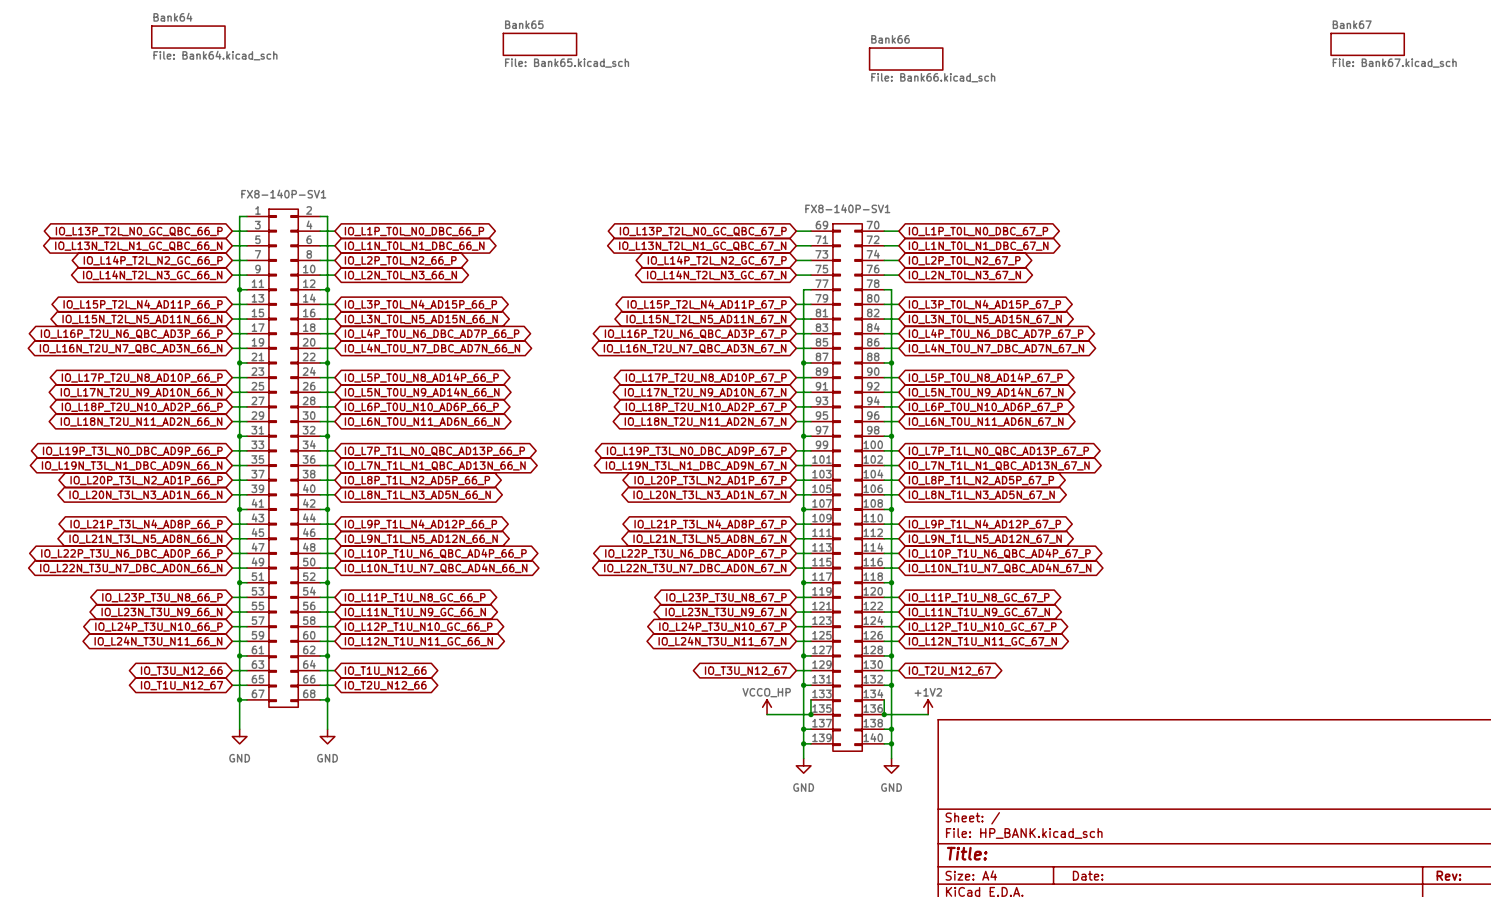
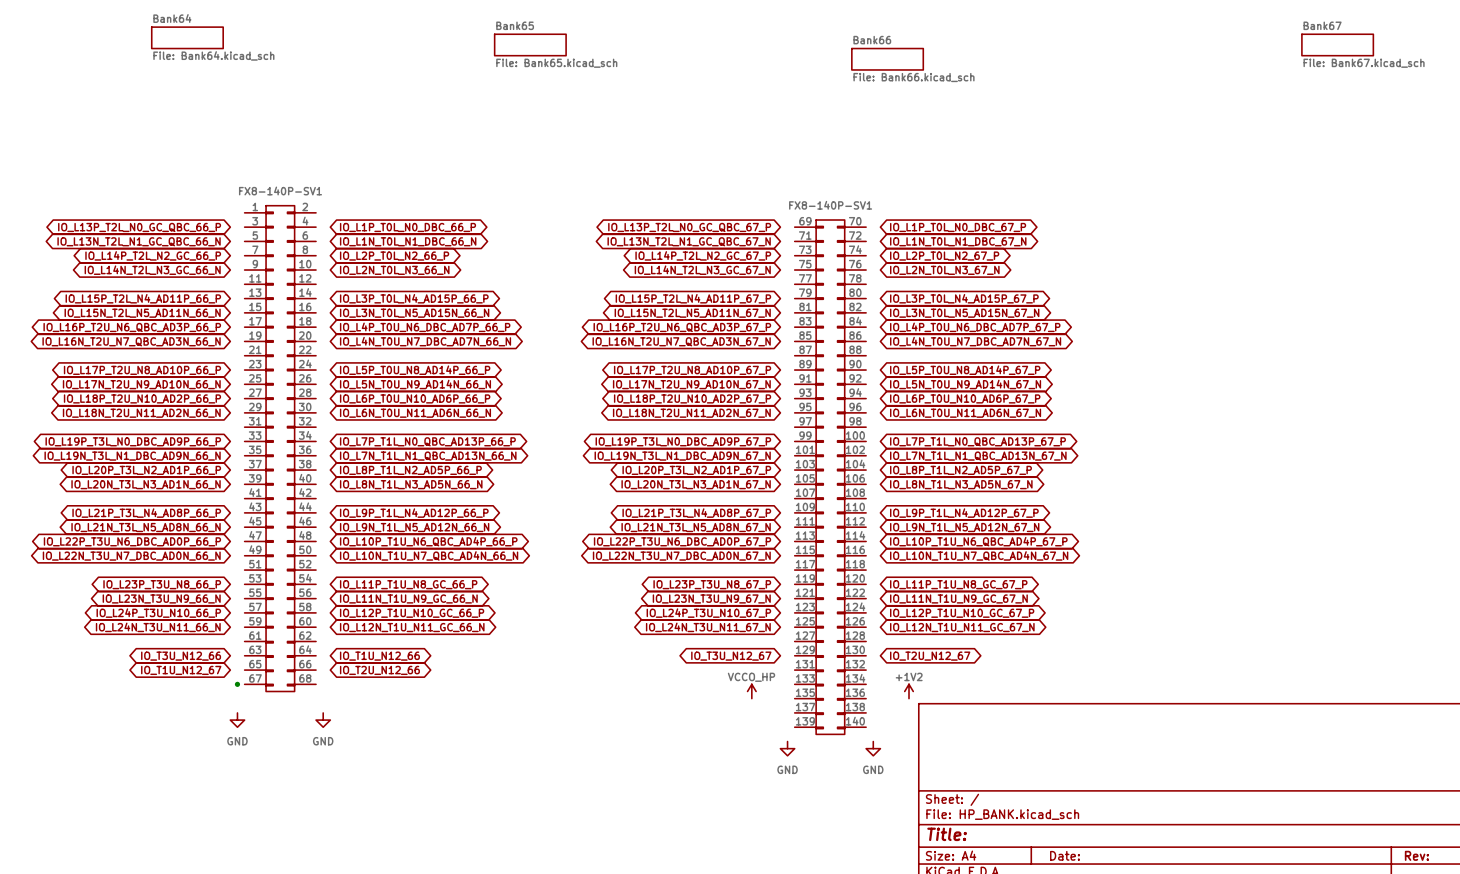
wire: (246, 216) (239, 216) (239, 729) -> none
wire: (320, 216) (327, 216) (327, 729) -> none
wire: (232, 231) (246, 231) -> none
wire: (320, 231) (334, 231) -> none
wire: (796, 231) (810, 231) -> none
wire: (884, 231) (898, 231) -> none
wire: (232, 245) (246, 245) -> none
wire: (320, 245) (334, 245) -> none
wire: (796, 245) (810, 245) -> none
wire: (884, 245) (898, 245) -> none
wire: (232, 260) (246, 260) -> none
wire: (320, 260) (334, 260) -> none
wire: (796, 260) (810, 260) -> none
wire: (884, 260) (898, 260) -> none
wire: (232, 275) (246, 275) -> none
wire: (320, 275) (334, 275) -> none
wire: (796, 275) (810, 275) -> none
wire: (884, 275) (898, 275) -> none
wire: (239, 289) (246, 289) -> none
junction: (239, 289) -> none
wire: (320, 289) (327, 289) -> none
junction: (327, 289) -> none
wire: (810, 289) (803, 289) (803, 758) -> none
wire: (884, 289) (891, 289) (891, 758) -> none
wire: (232, 304) (246, 304) -> none
wire: (320, 304) (334, 304) -> none
wire: (796, 304) (810, 304) -> none
wire: (884, 304) (898, 304) -> none
wire: (232, 319) (246, 319) -> none
wire: (320, 319) (334, 319) -> none
wire: (796, 319) (810, 319) -> none
wire: (884, 319) (898, 319) -> none
wire: (232, 333) (246, 333) -> none
wire: (320, 333) (334, 333) -> none
wire: (796, 333) (810, 333) -> none
wire: (884, 333) (898, 333) -> none
wire: (232, 348) (246, 348) -> none
wire: (320, 348) (334, 348) -> none
wire: (796, 348) (810, 348) -> none
wire: (884, 348) (898, 348) -> none
wire: (239, 362) (246, 362) -> none
junction: (239, 362) -> none
wire: (320, 362) (327, 362) -> none
junction: (327, 362) -> none
wire: (803, 362) (810, 362) -> none
junction: (803, 362) -> none
wire: (884, 362) (891, 362) -> none
junction: (891, 362) -> none
wire: (232, 377) (246, 377) -> none
wire: (320, 377) (334, 377) -> none
wire: (796, 377) (810, 377) -> none
wire: (884, 377) (898, 377) -> none
wire: (232, 392) (246, 392) -> none
wire: (320, 392) (334, 392) -> none
wire: (796, 392) (810, 392) -> none
wire: (884, 392) (898, 392) -> none
wire: (232, 406) (246, 406) -> none
wire: (320, 406) (334, 406) -> none
wire: (796, 406) (810, 406) -> none
wire: (884, 406) (898, 406) -> none
wire: (232, 421) (246, 421) -> none
wire: (320, 421) (334, 421) -> none
wire: (796, 421) (810, 421) -> none
wire: (884, 421) (898, 421) -> none
wire: (239, 436) (246, 436) -> none
junction: (239, 436) -> none
wire: (320, 436) (327, 436) -> none
junction: (327, 436) -> none
wire: (803, 436) (810, 436) -> none
junction: (803, 436) -> none
wire: (884, 436) (891, 436) -> none
junction: (891, 436) -> none
wire: (232, 450) (246, 450) -> none
wire: (320, 450) (334, 450) -> none
wire: (796, 450) (810, 450) -> none
wire: (884, 450) (898, 450) -> none
wire: (232, 465) (246, 465) -> none
wire: (320, 465) (334, 465) -> none
wire: (796, 465) (810, 465) -> none
wire: (884, 465) (898, 465) -> none
wire: (232, 480) (246, 480) -> none
wire: (320, 480) (334, 480) -> none
wire: (796, 480) (810, 480) -> none
wire: (884, 480) (898, 480) -> none
wire: (232, 494) (246, 494) -> none
wire: (320, 494) (334, 494) -> none
wire: (796, 494) (810, 494) -> none
wire: (884, 494) (898, 494) -> none
wire: (239, 509) (246, 509) -> none
junction: (239, 509) -> none
wire: (320, 509) (327, 509) -> none
junction: (327, 509) -> none
wire: (803, 509) (810, 509) -> none
junction: (803, 509) -> none
wire: (884, 509) (891, 509) -> none
junction: (891, 509) -> none
wire: (232, 524) (246, 524) -> none
wire: (320, 524) (334, 524) -> none
wire: (796, 524) (810, 524) -> none
wire: (884, 524) (898, 524) -> none
wire: (232, 538) (246, 538) -> none
wire: (320, 538) (334, 538) -> none
wire: (796, 538) (810, 538) -> none
wire: (884, 538) (898, 538) -> none
wire: (232, 553) (246, 553) -> none
wire: (320, 553) (334, 553) -> none
wire: (796, 553) (810, 553) -> none
wire: (884, 553) (898, 553) -> none
wire: (232, 568) (246, 568) -> none
wire: (320, 568) (334, 568) -> none
wire: (796, 568) (810, 568) -> none
wire: (884, 568) (898, 568) -> none
wire: (239, 582) (246, 582) -> none
junction: (239, 582) -> none
wire: (320, 582) (327, 582) -> none
junction: (327, 582) -> none
wire: (803, 582) (810, 582) -> none
junction: (803, 582) -> none
wire: (884, 582) (891, 582) -> none
junction: (891, 582) -> none
wire: (232, 597) (246, 597) -> none
wire: (320, 597) (334, 597) -> none
wire: (796, 597) (810, 597) -> none
wire: (884, 597) (898, 597) -> none
wire: (232, 612) (246, 612) -> none
wire: (320, 612) (334, 612) -> none
wire: (796, 612) (810, 612) -> none
wire: (884, 612) (898, 612) -> none
wire: (232, 626) (246, 626) -> none
wire: (320, 626) (334, 626) -> none
wire: (796, 626) (810, 626) -> none
wire: (884, 626) (898, 626) -> none
wire: (232, 641) (246, 641) -> none
wire: (320, 641) (334, 641) -> none
wire: (796, 641) (810, 641) -> none
wire: (884, 641) (898, 641) -> none
wire: (239, 655) (246, 655) -> none
junction: (239, 655) -> none
wire: (320, 655) (327, 655) -> none
junction: (327, 655) -> none
wire: (803, 655) (810, 655) -> none
junction: (803, 655) -> none
wire: (884, 655) (891, 655) -> none
junction: (891, 655) -> none
wire: (232, 670) (246, 670) -> none
wire: (320, 670) (334, 670) -> none
wire: (796, 670) (810, 670) -> none
wire: (884, 670) (898, 670) -> none
wire: (232, 685) (246, 685) -> none
wire: (320, 685) (334, 685) -> none
wire: (803, 685) (810, 685) -> none
junction: (803, 685) -> none
wire: (884, 685) (891, 685) -> none
junction: (891, 685) -> none
wire: (239, 699) (246, 699) -> none
wire: (320, 699) (327, 699) -> none
junction: (327, 699) -> none
wire: (810, 699) (810, 714) (767, 714) -> none
wire: (884, 699) (884, 714) (928, 714) -> none
junction: (810, 714) -> none
junction: (884, 714) -> none
wire: (803, 729) (810, 729) -> none
junction: (803, 729) -> none
wire: (884, 729) (891, 729) -> none
junction: (891, 729) -> none
wire: (803, 743) (810, 743) -> none
junction: (803, 743) -> none
wire: (884, 743) (891, 743) -> none
junction: (891, 743) -> none

